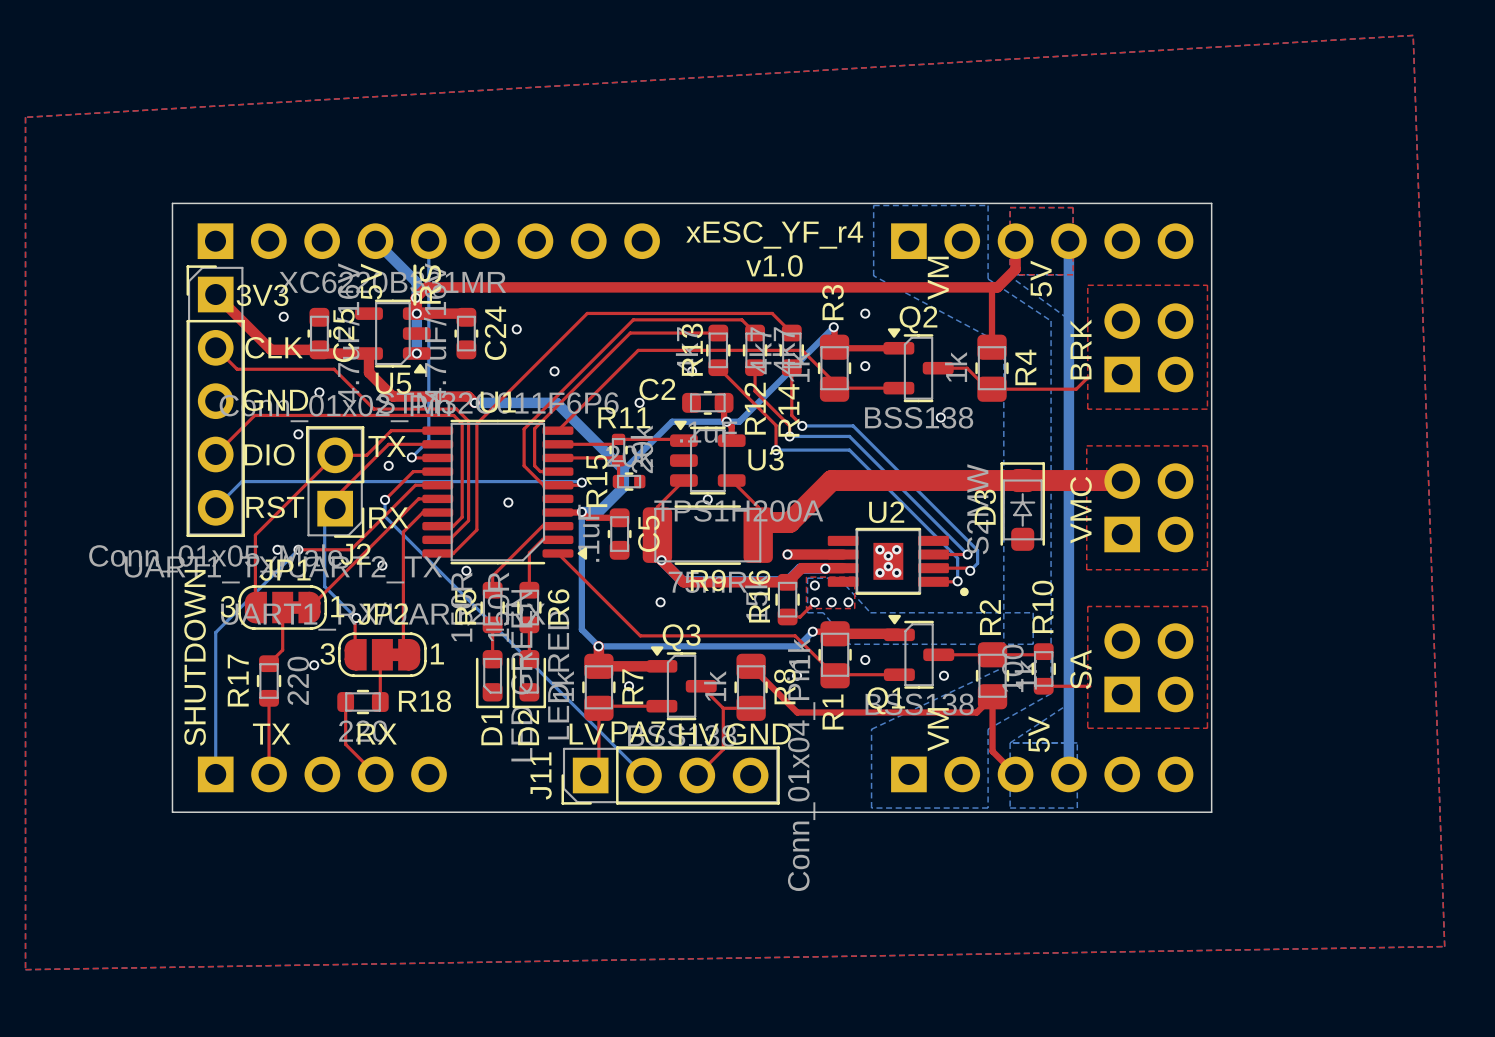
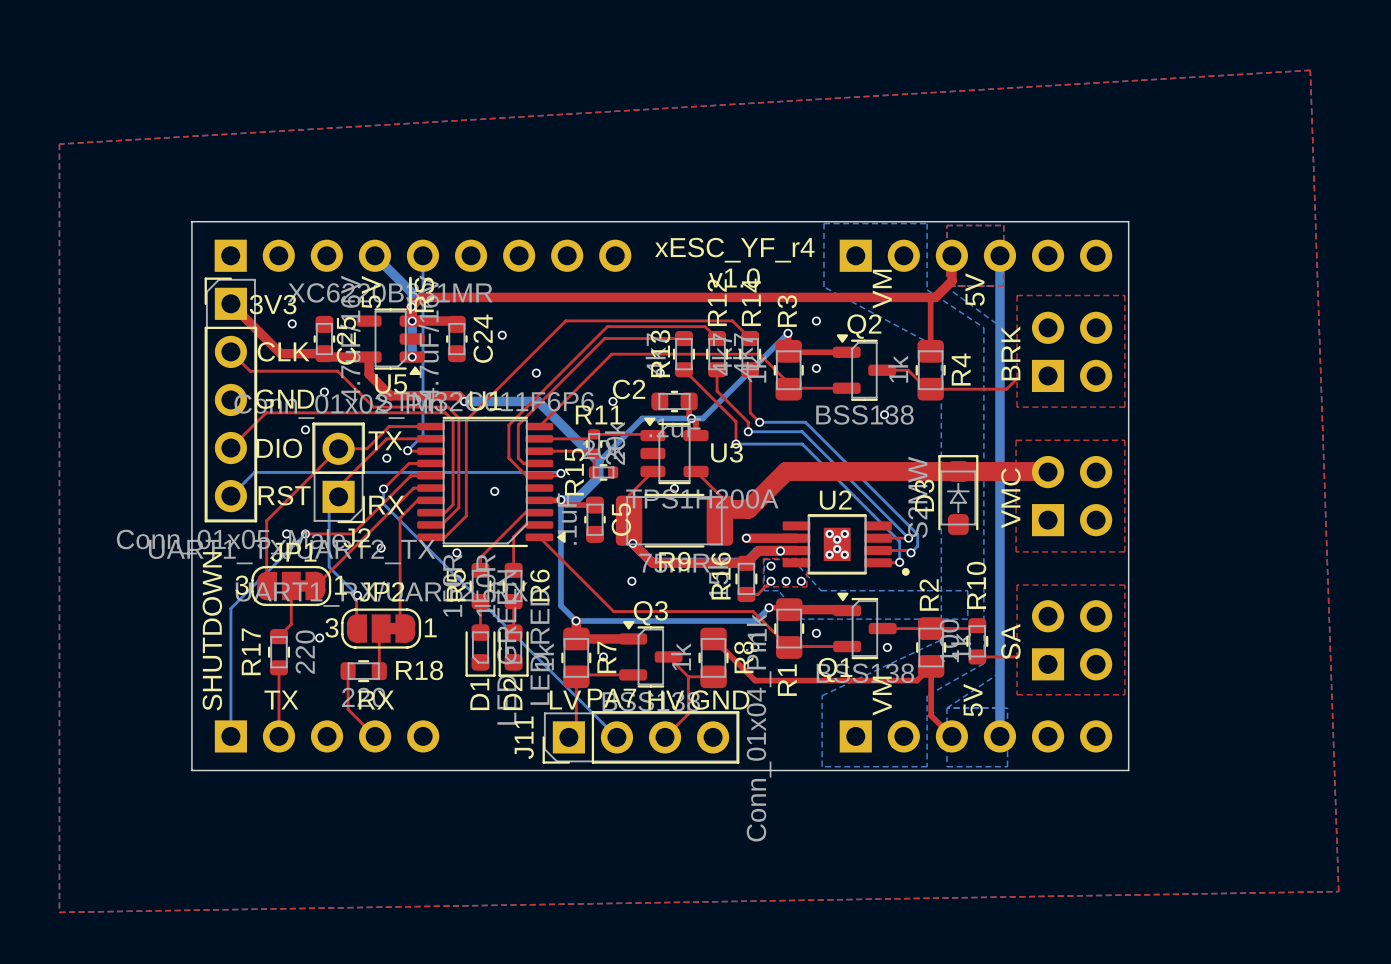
R12 name position: R12 (755, 408) -> R12 (717, 302)
R14 name position: R14 (788, 410) -> R14 (751, 302)

